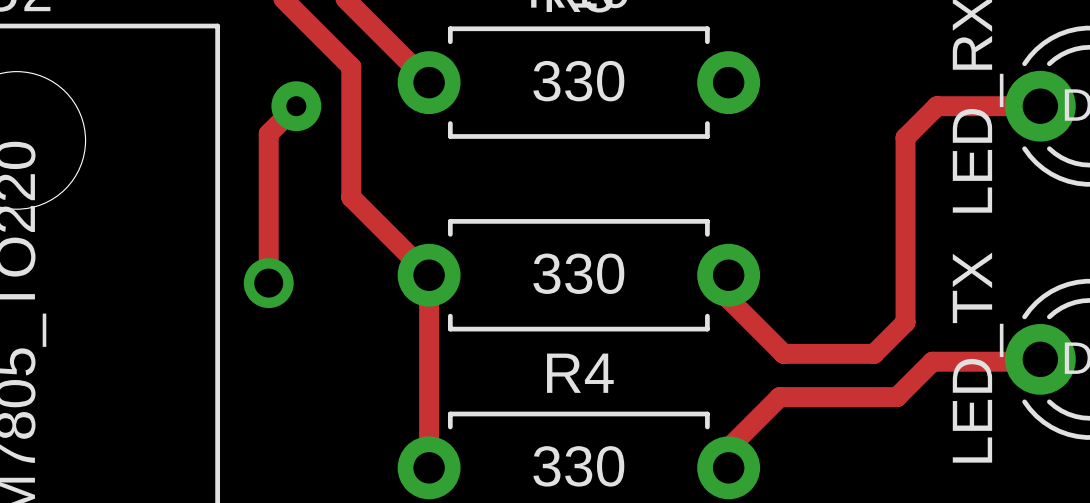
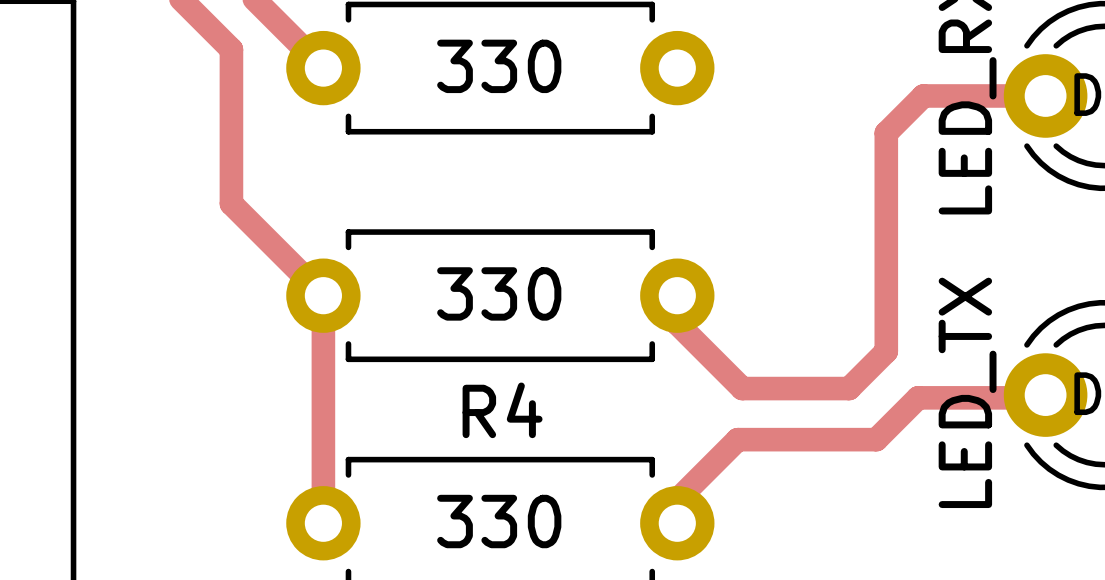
track: (296, 106) (268, 133) (268, 283) -> none
via: (296, 106) -> none
via: (268, 283) -> none

